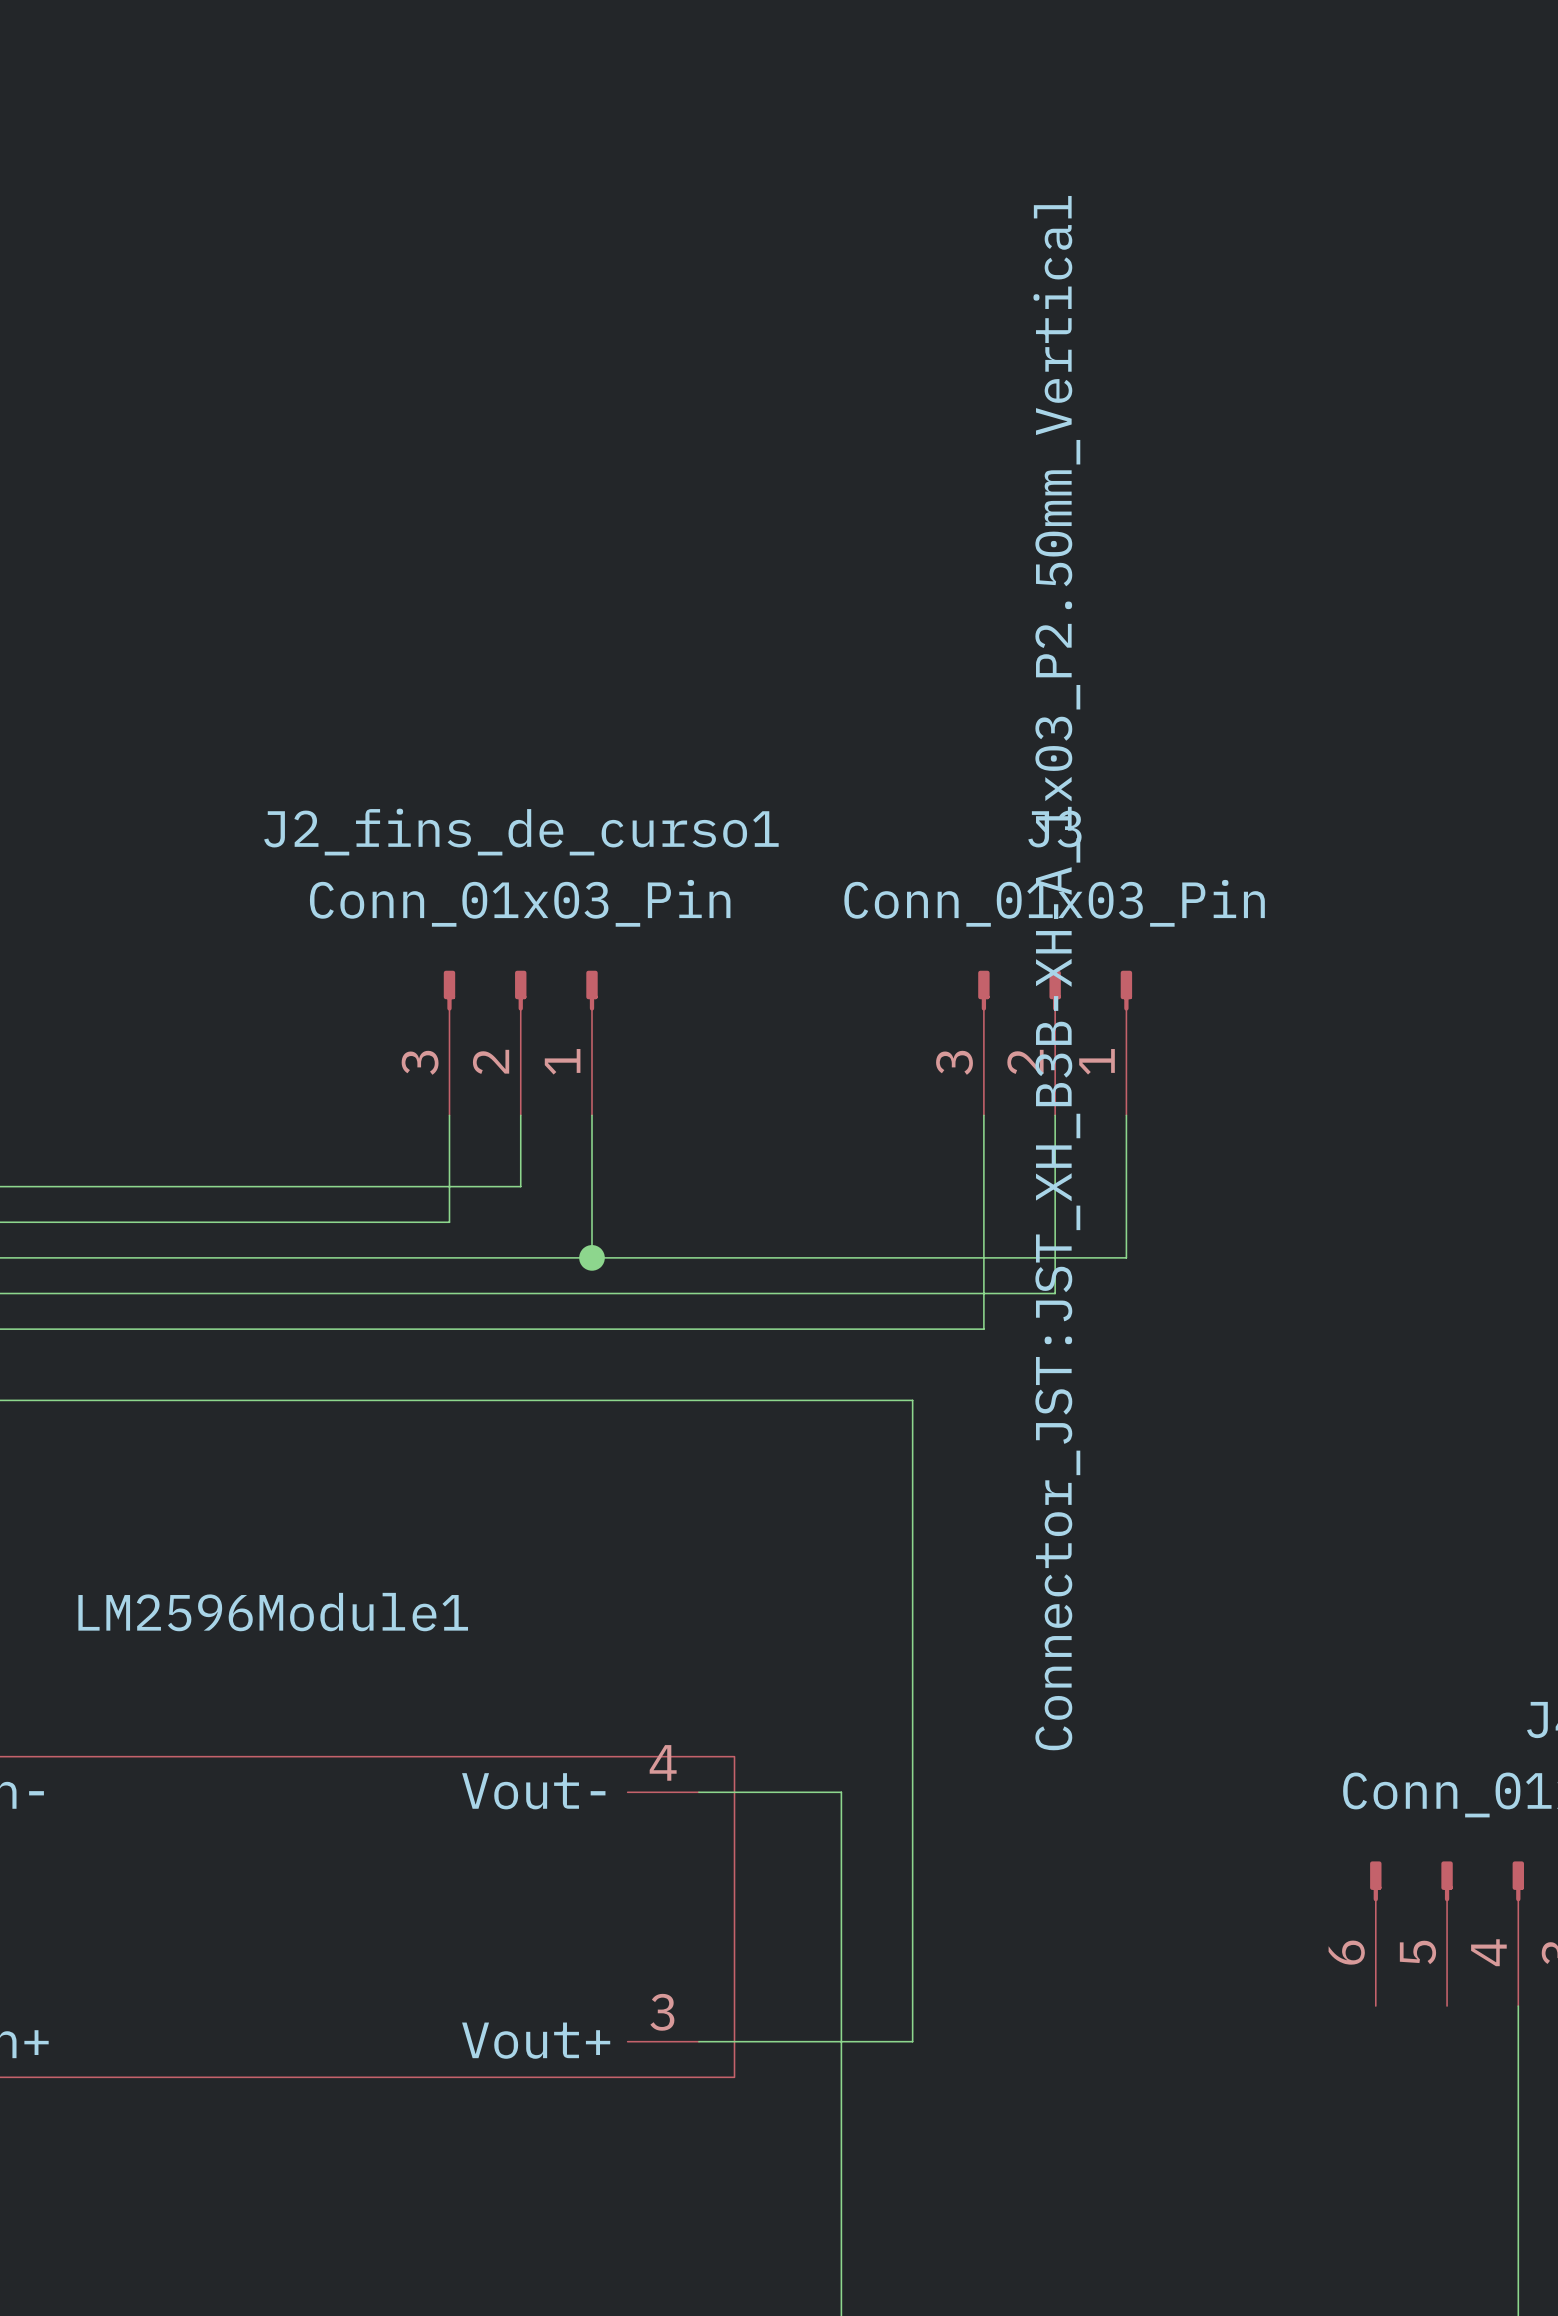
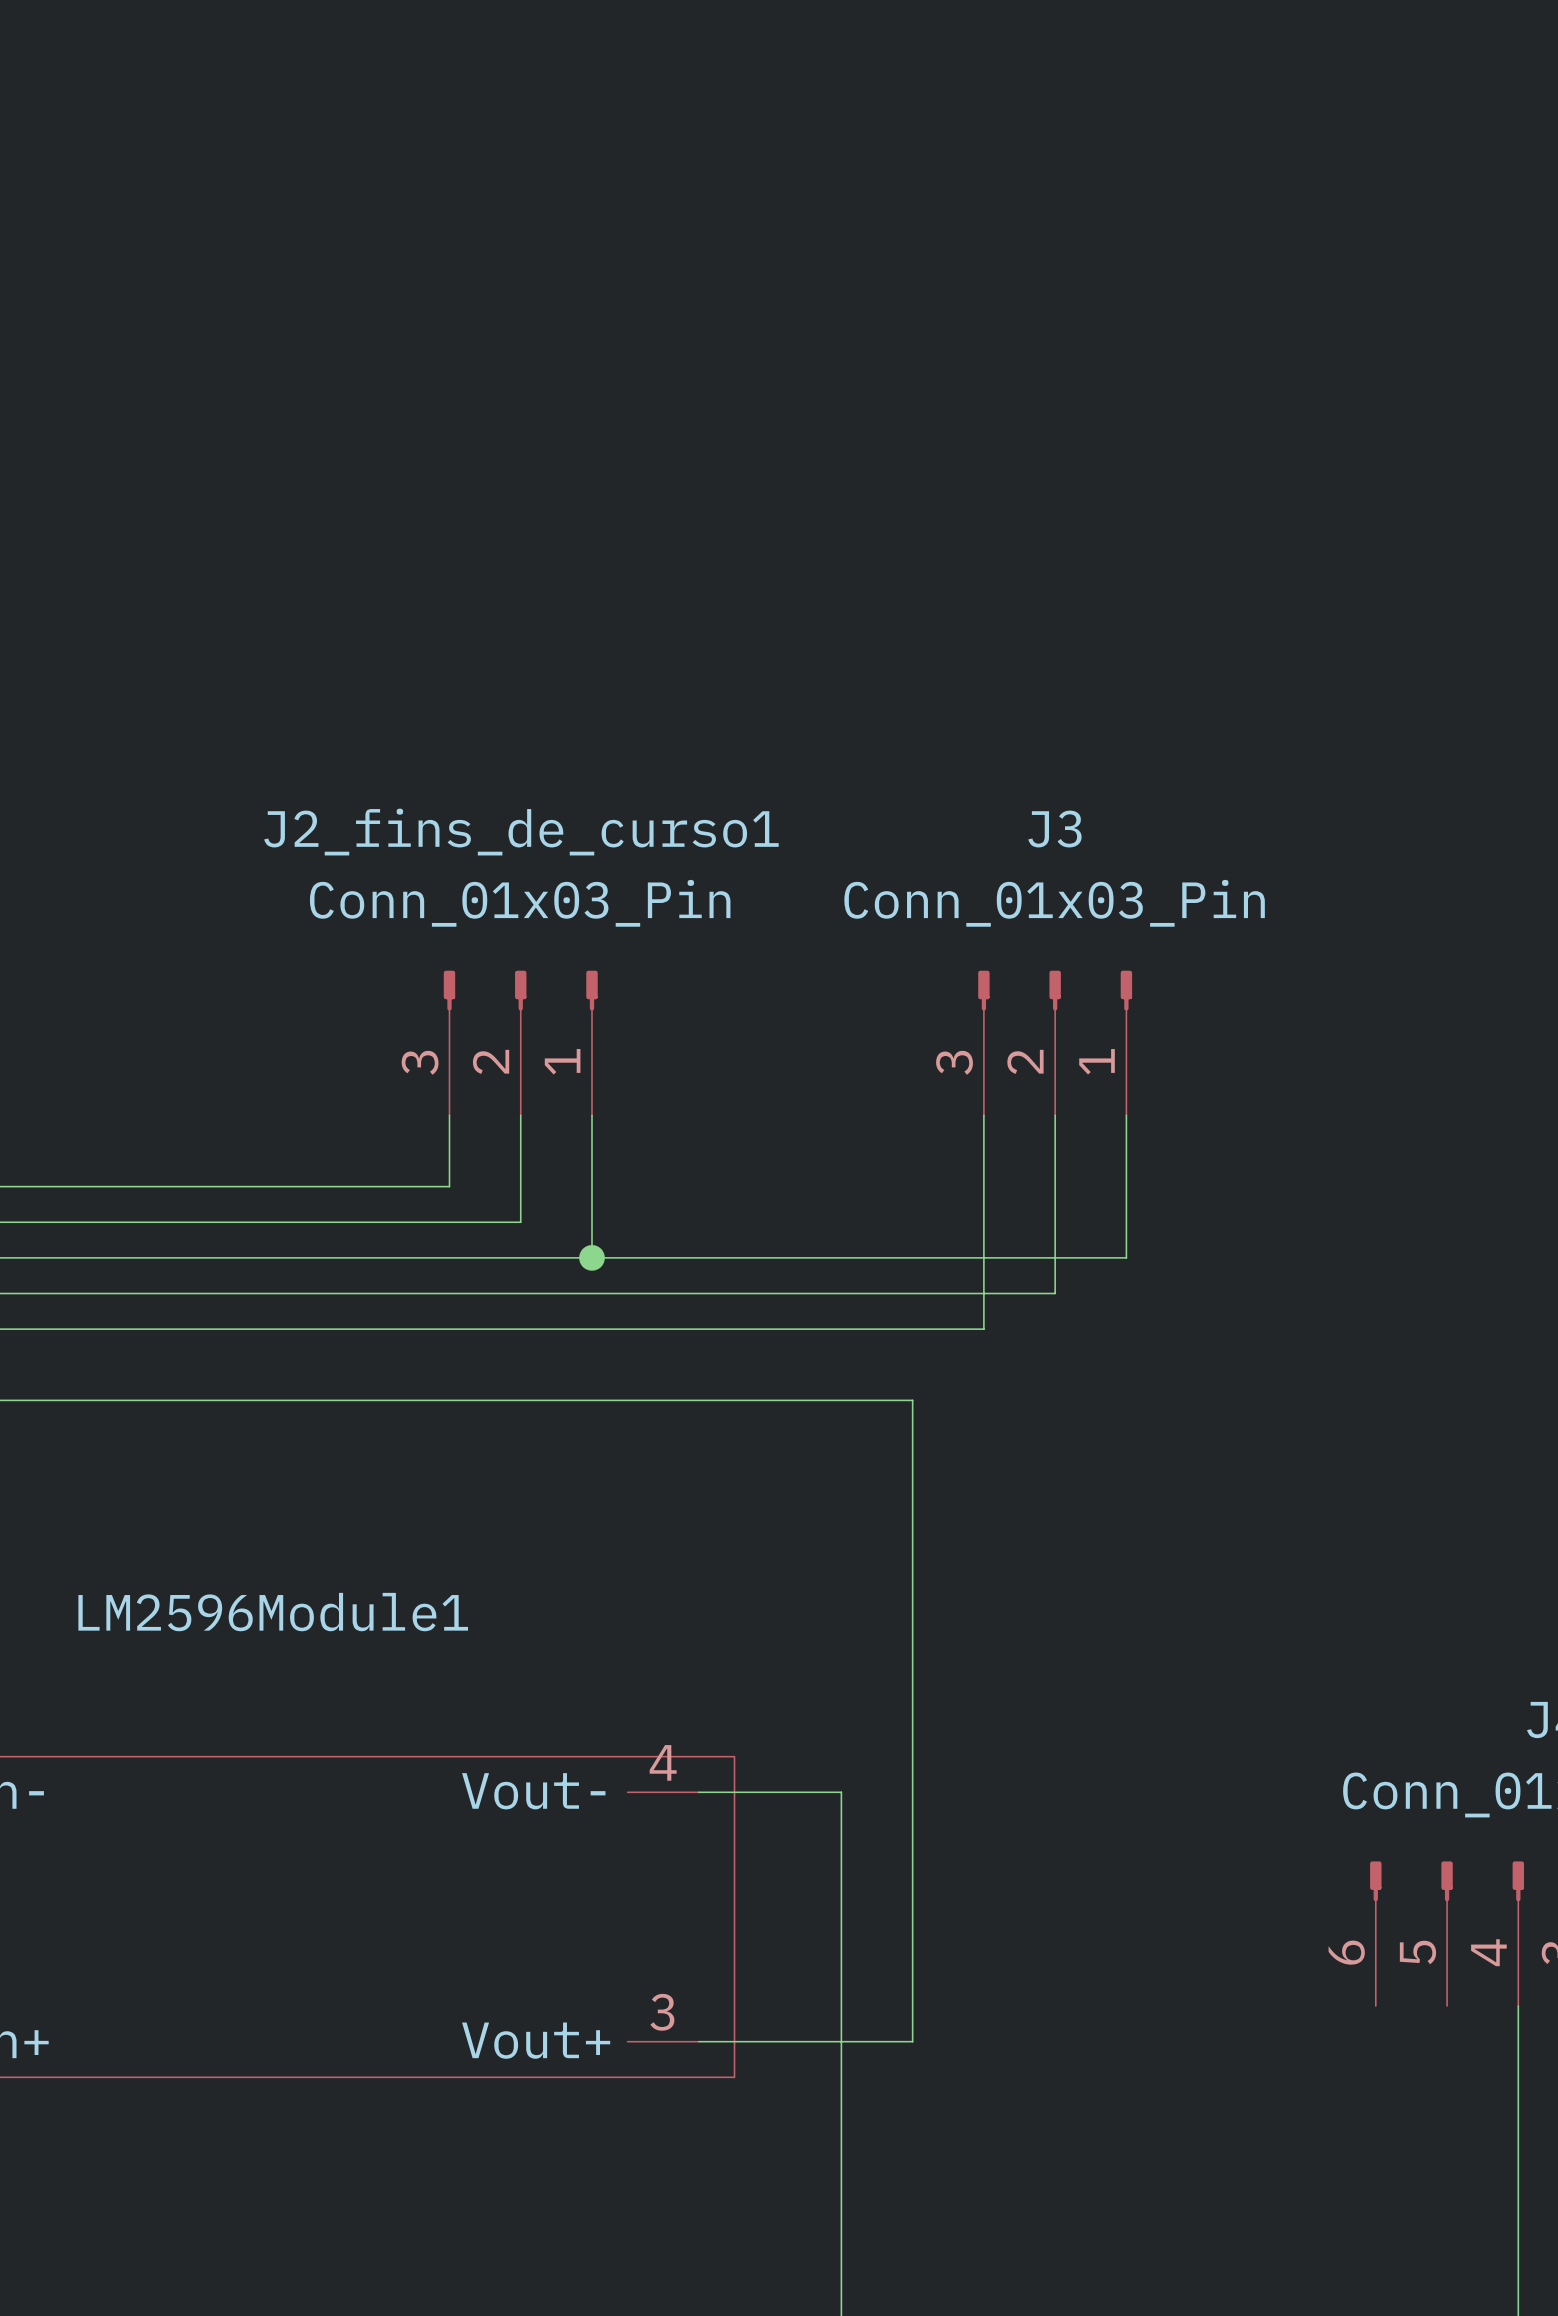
J3 text: Connector_JST:JST_XH_B3B-XH-A_1x03_P2.50mm_Vertical (1056, 973) -> none
wire: (520, 1186) (449, 1186) (449, 1222) -> (520, 1186) (520, 1222) (449, 1222)

